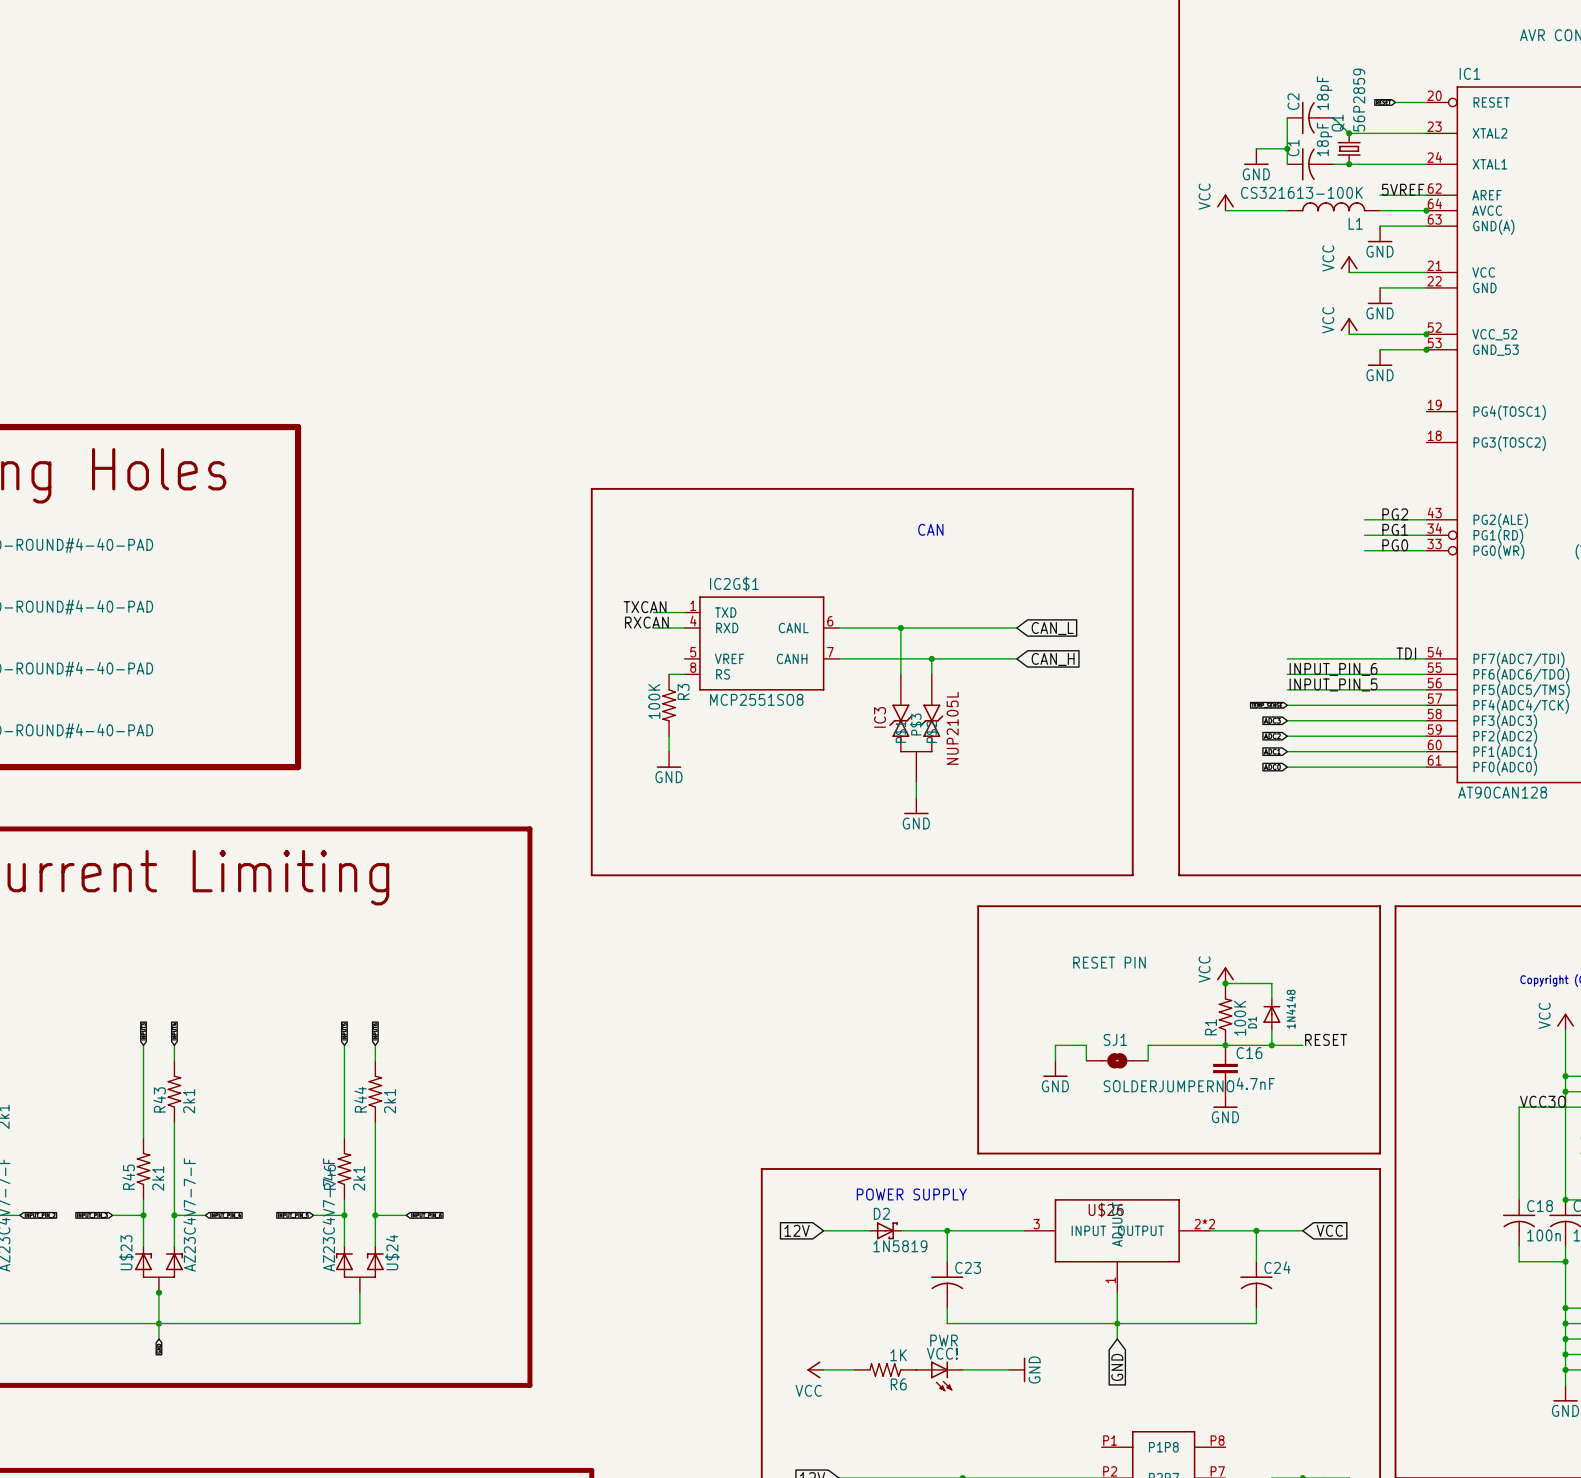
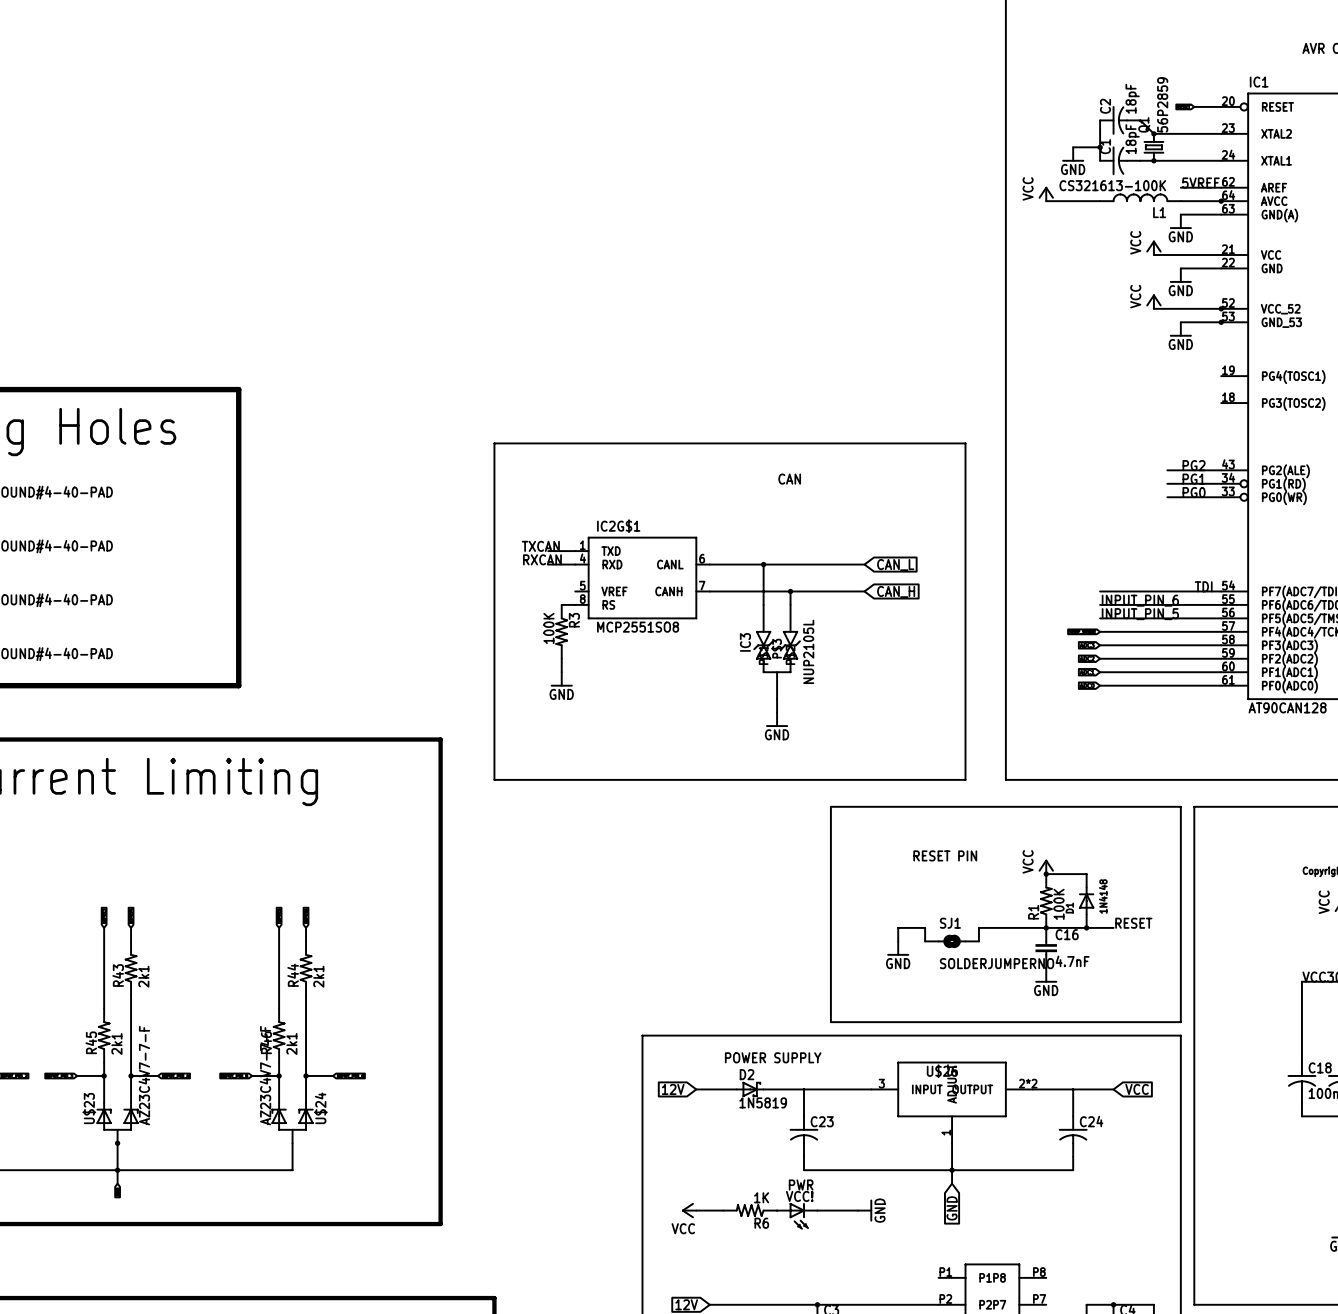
junction: (947, 1230) -> none
junction: (1256, 1230) -> none

